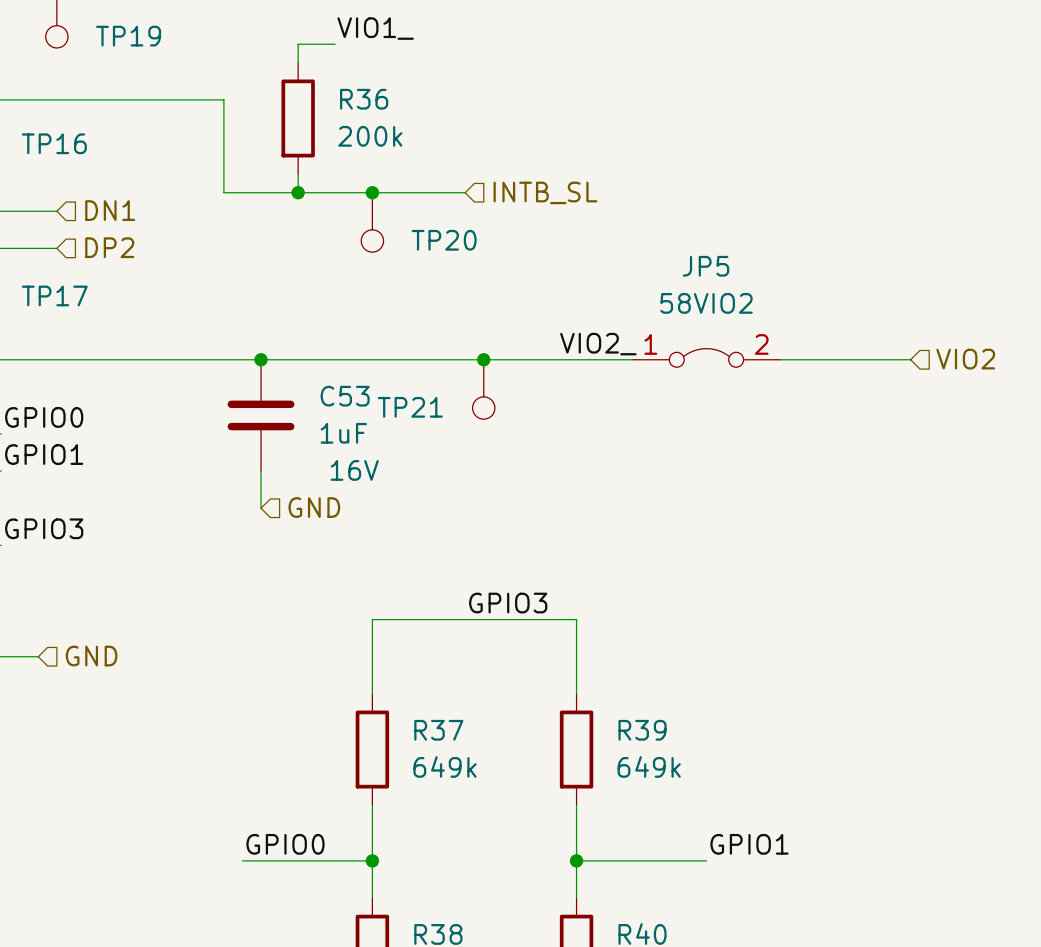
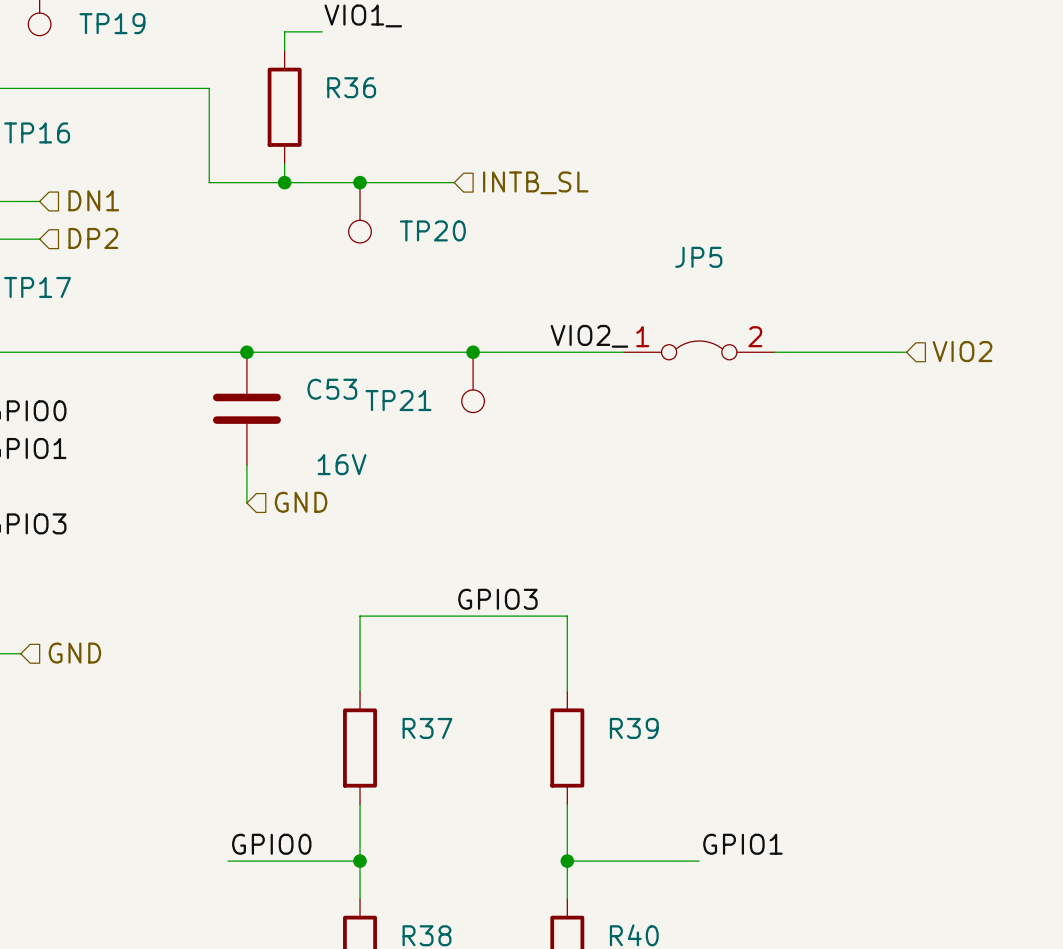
R36 value: 200k (370, 136) -> none
JP5 value: 58VIO2 (706, 303) -> none
C53 value: 1uF (343, 433) -> none
R37 value: 649k (445, 766) -> none
R39 value: 649k (649, 766) -> none

